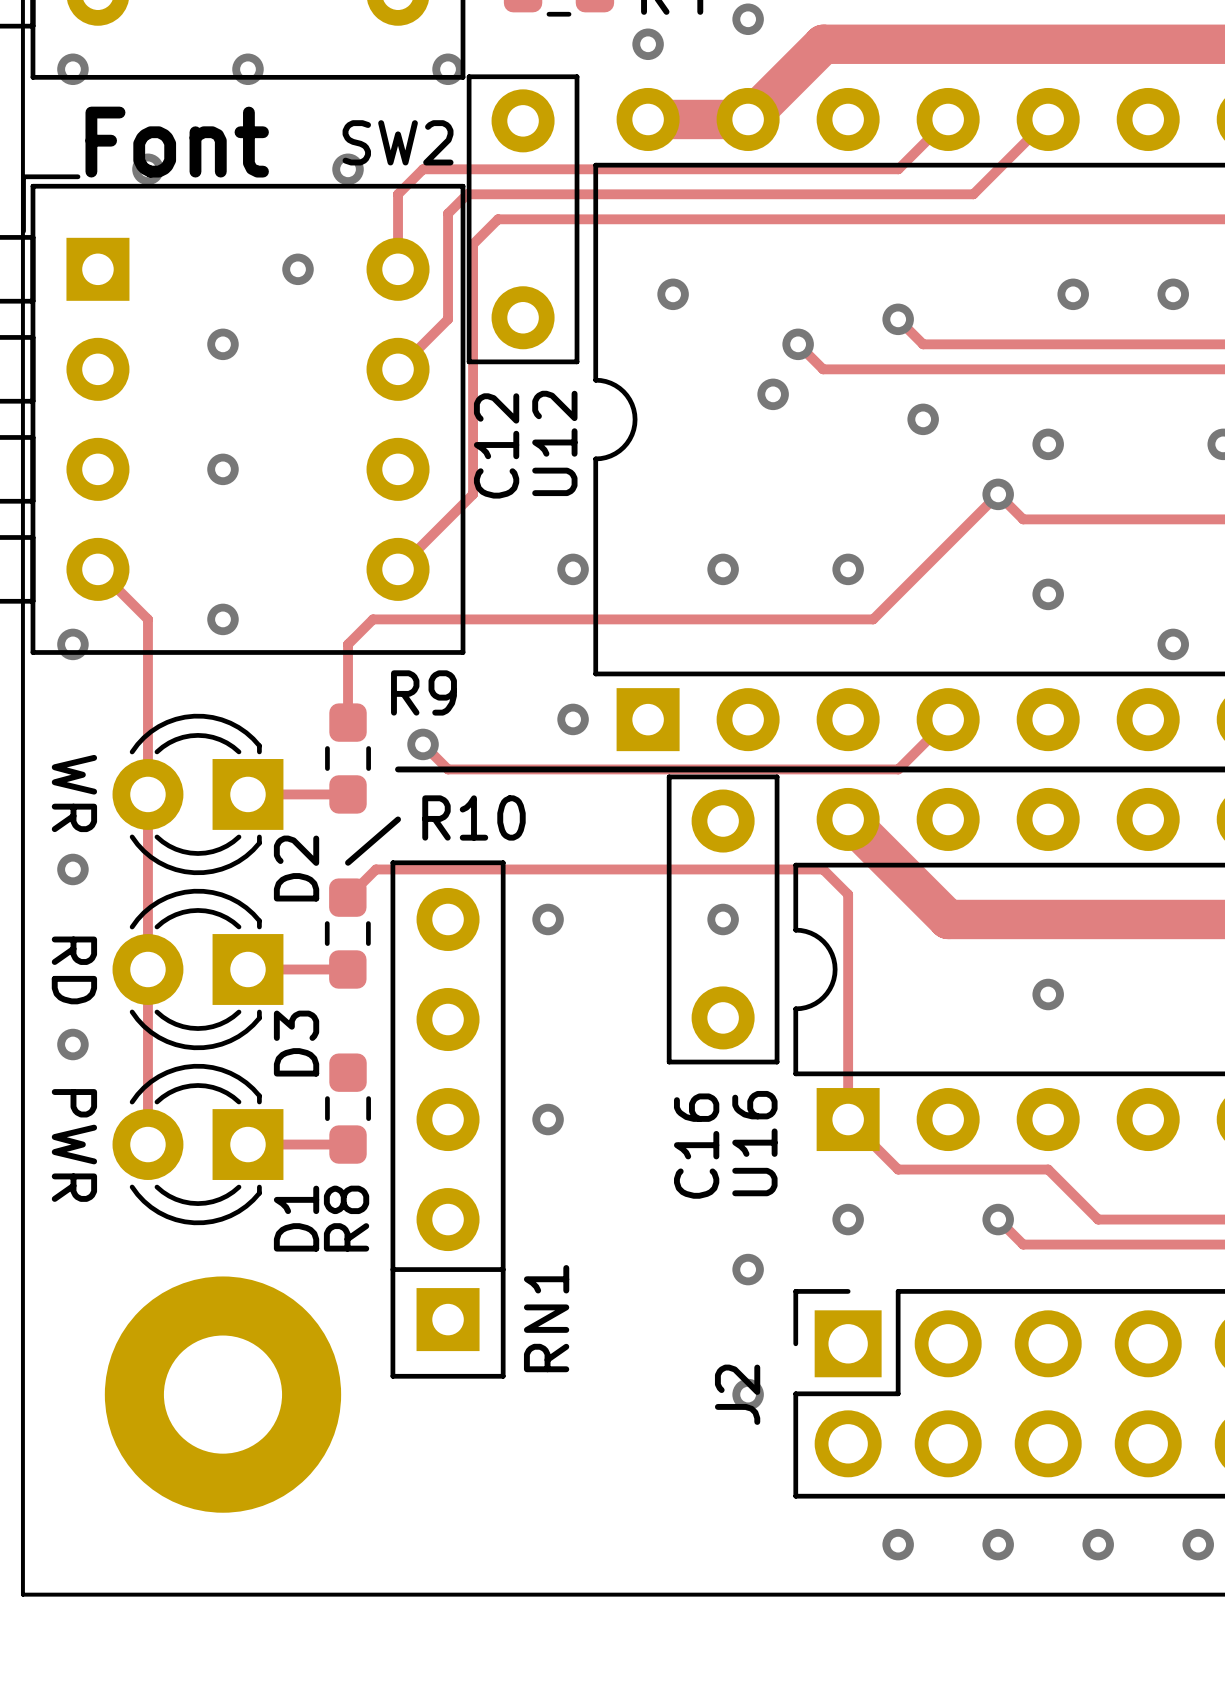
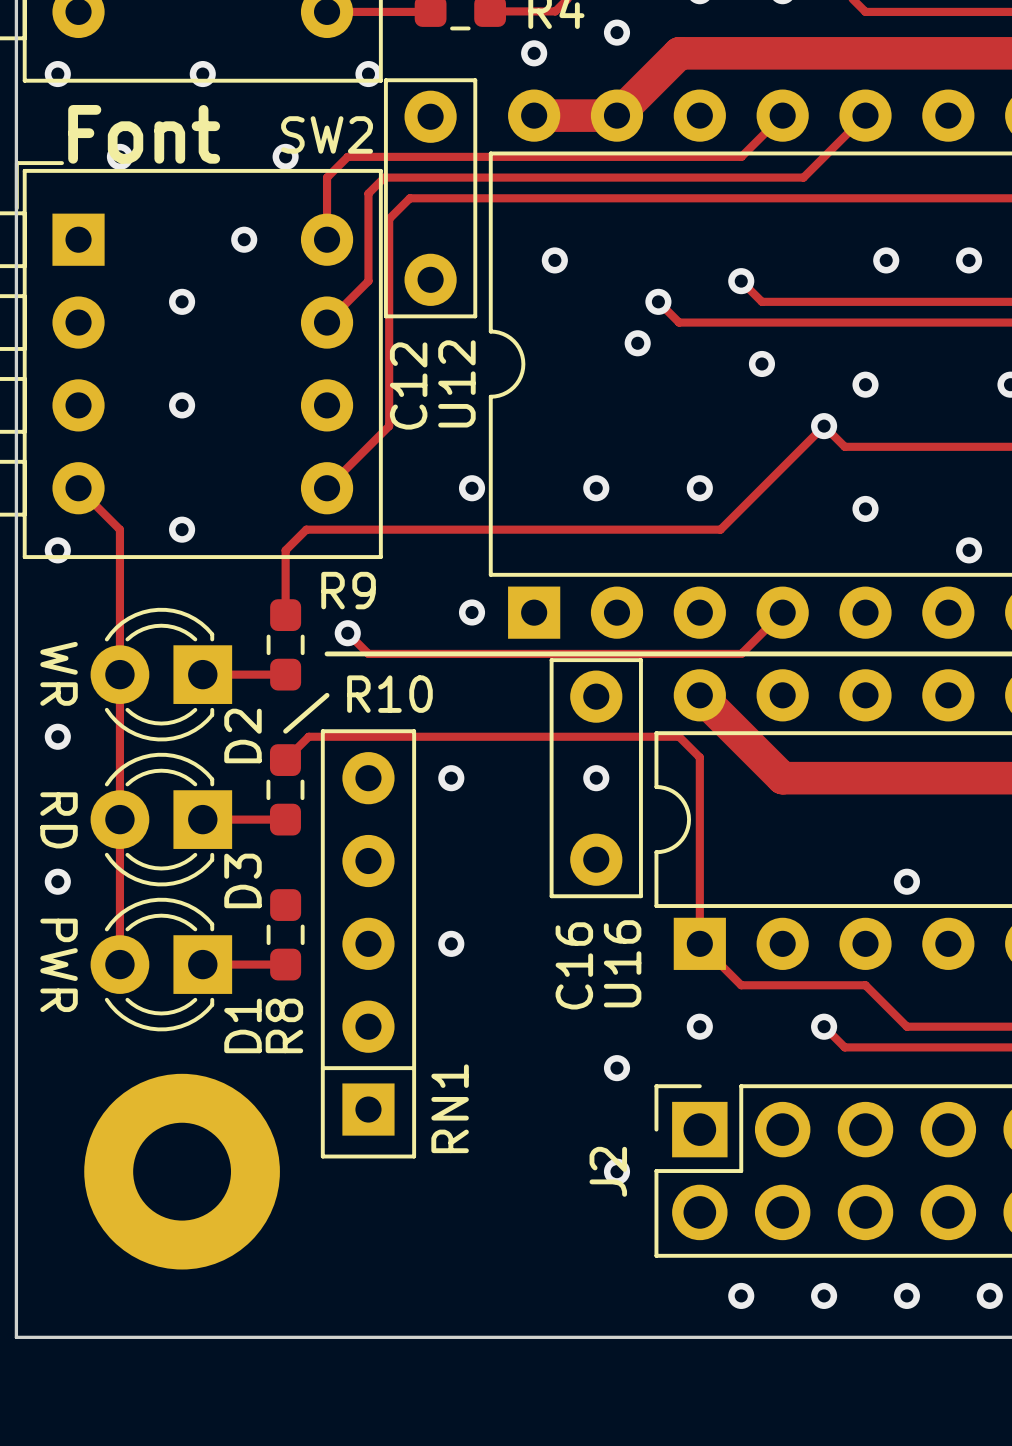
via position: (1048, 994) -> (906, 881)

